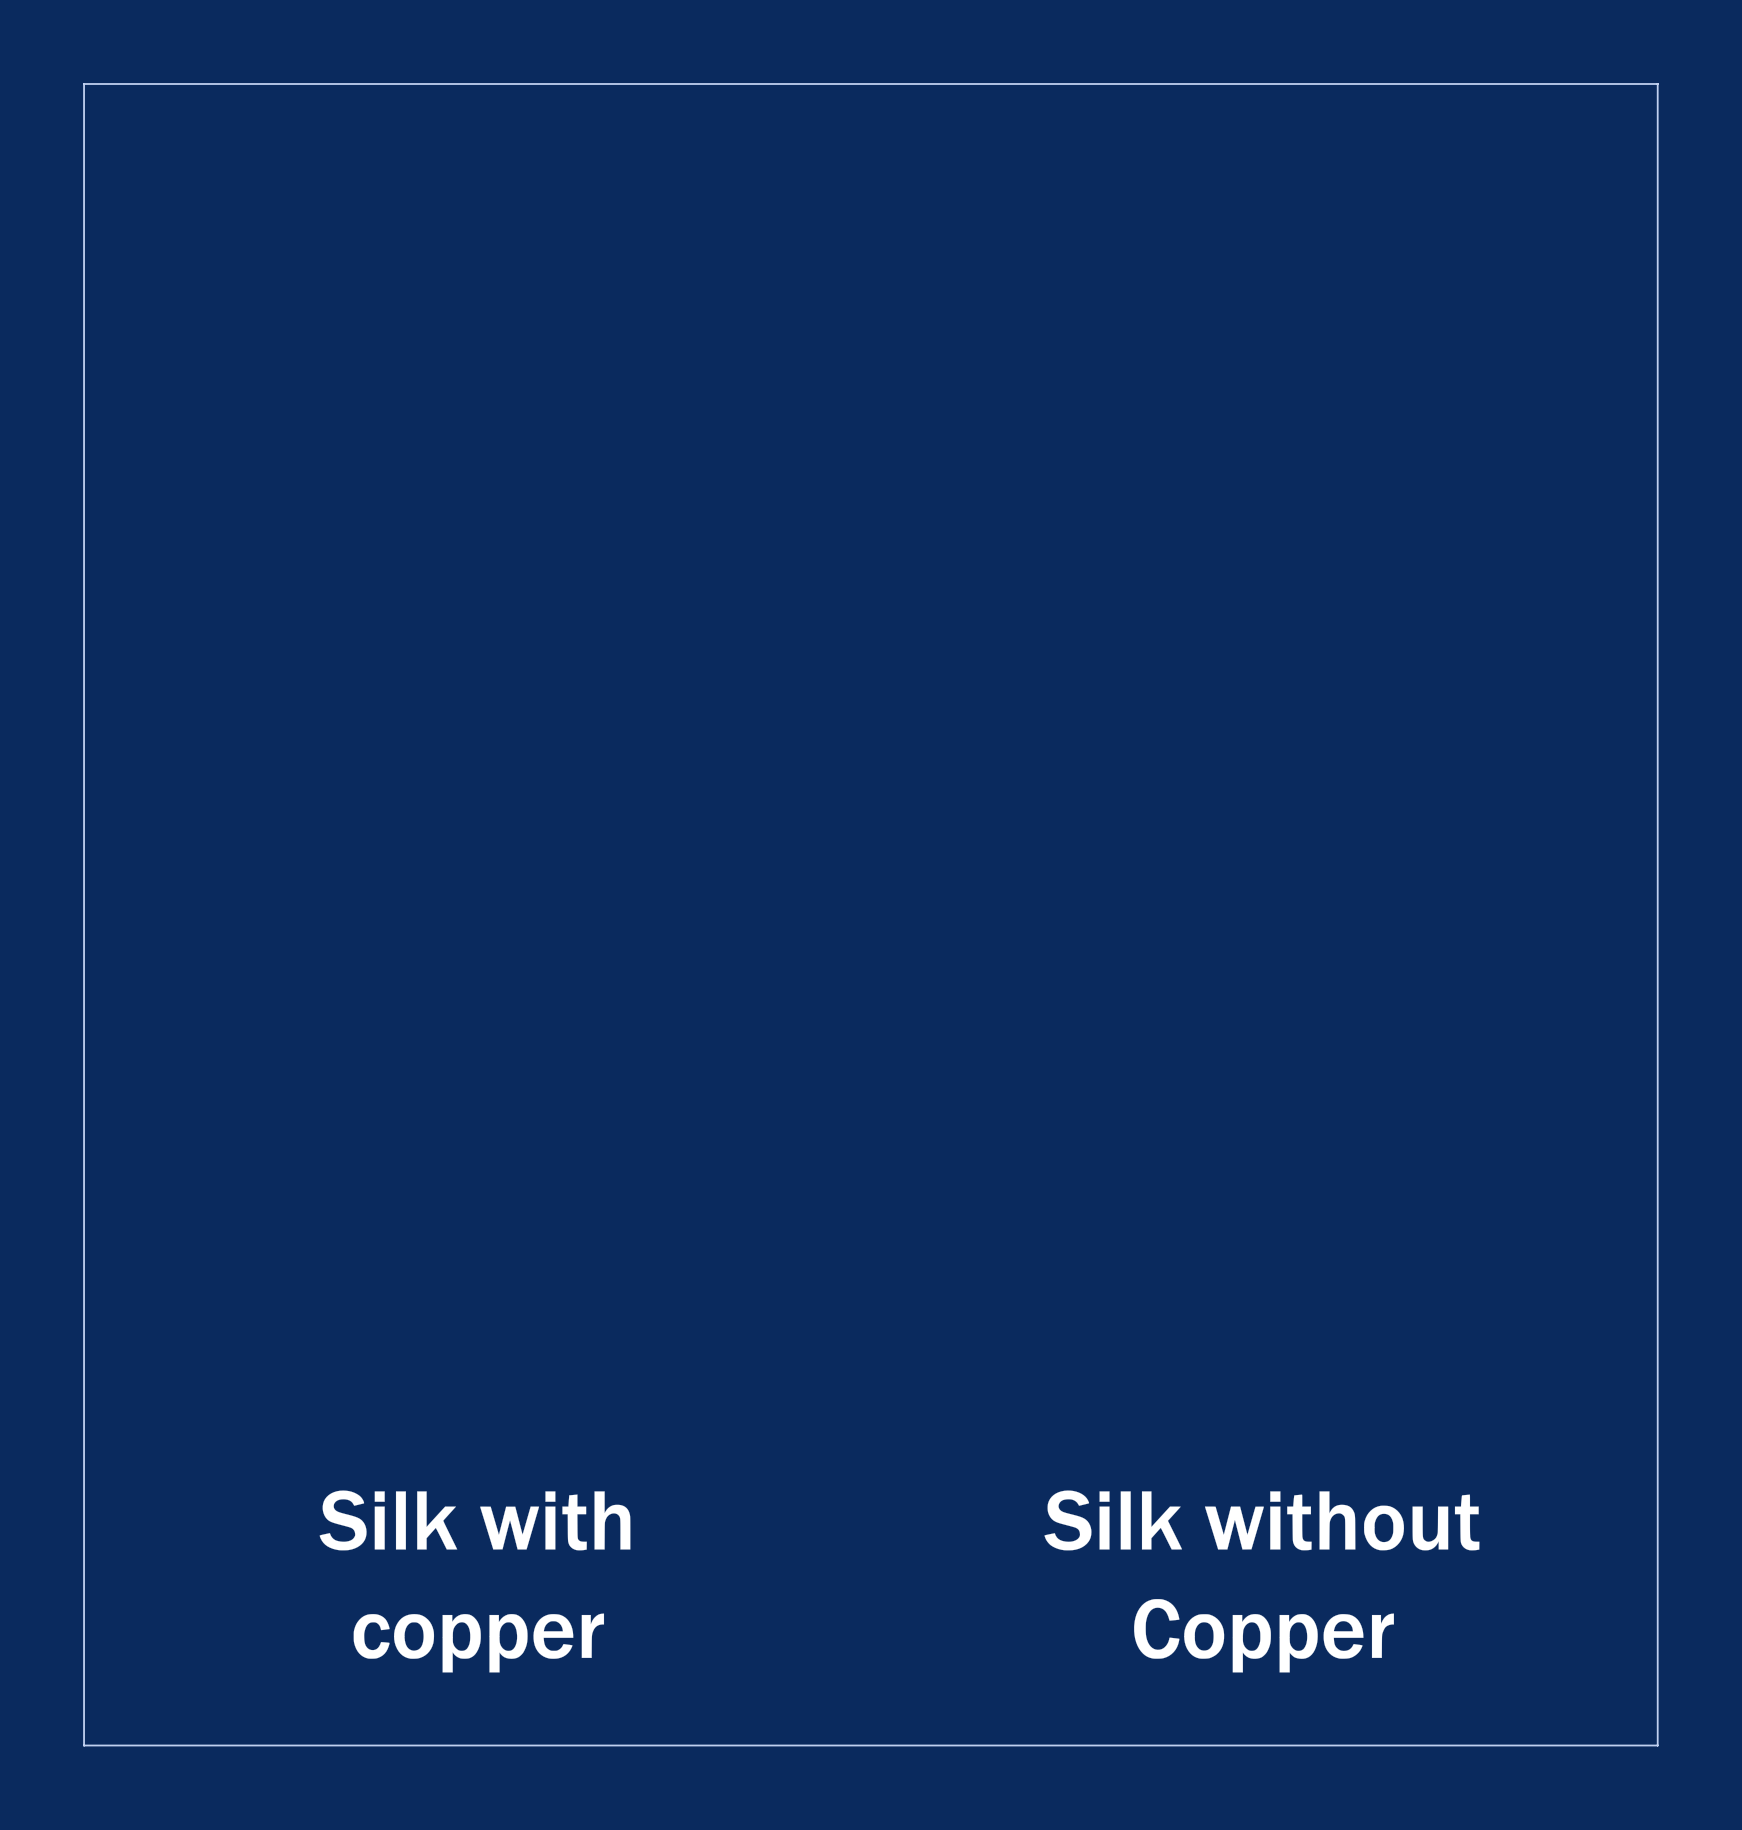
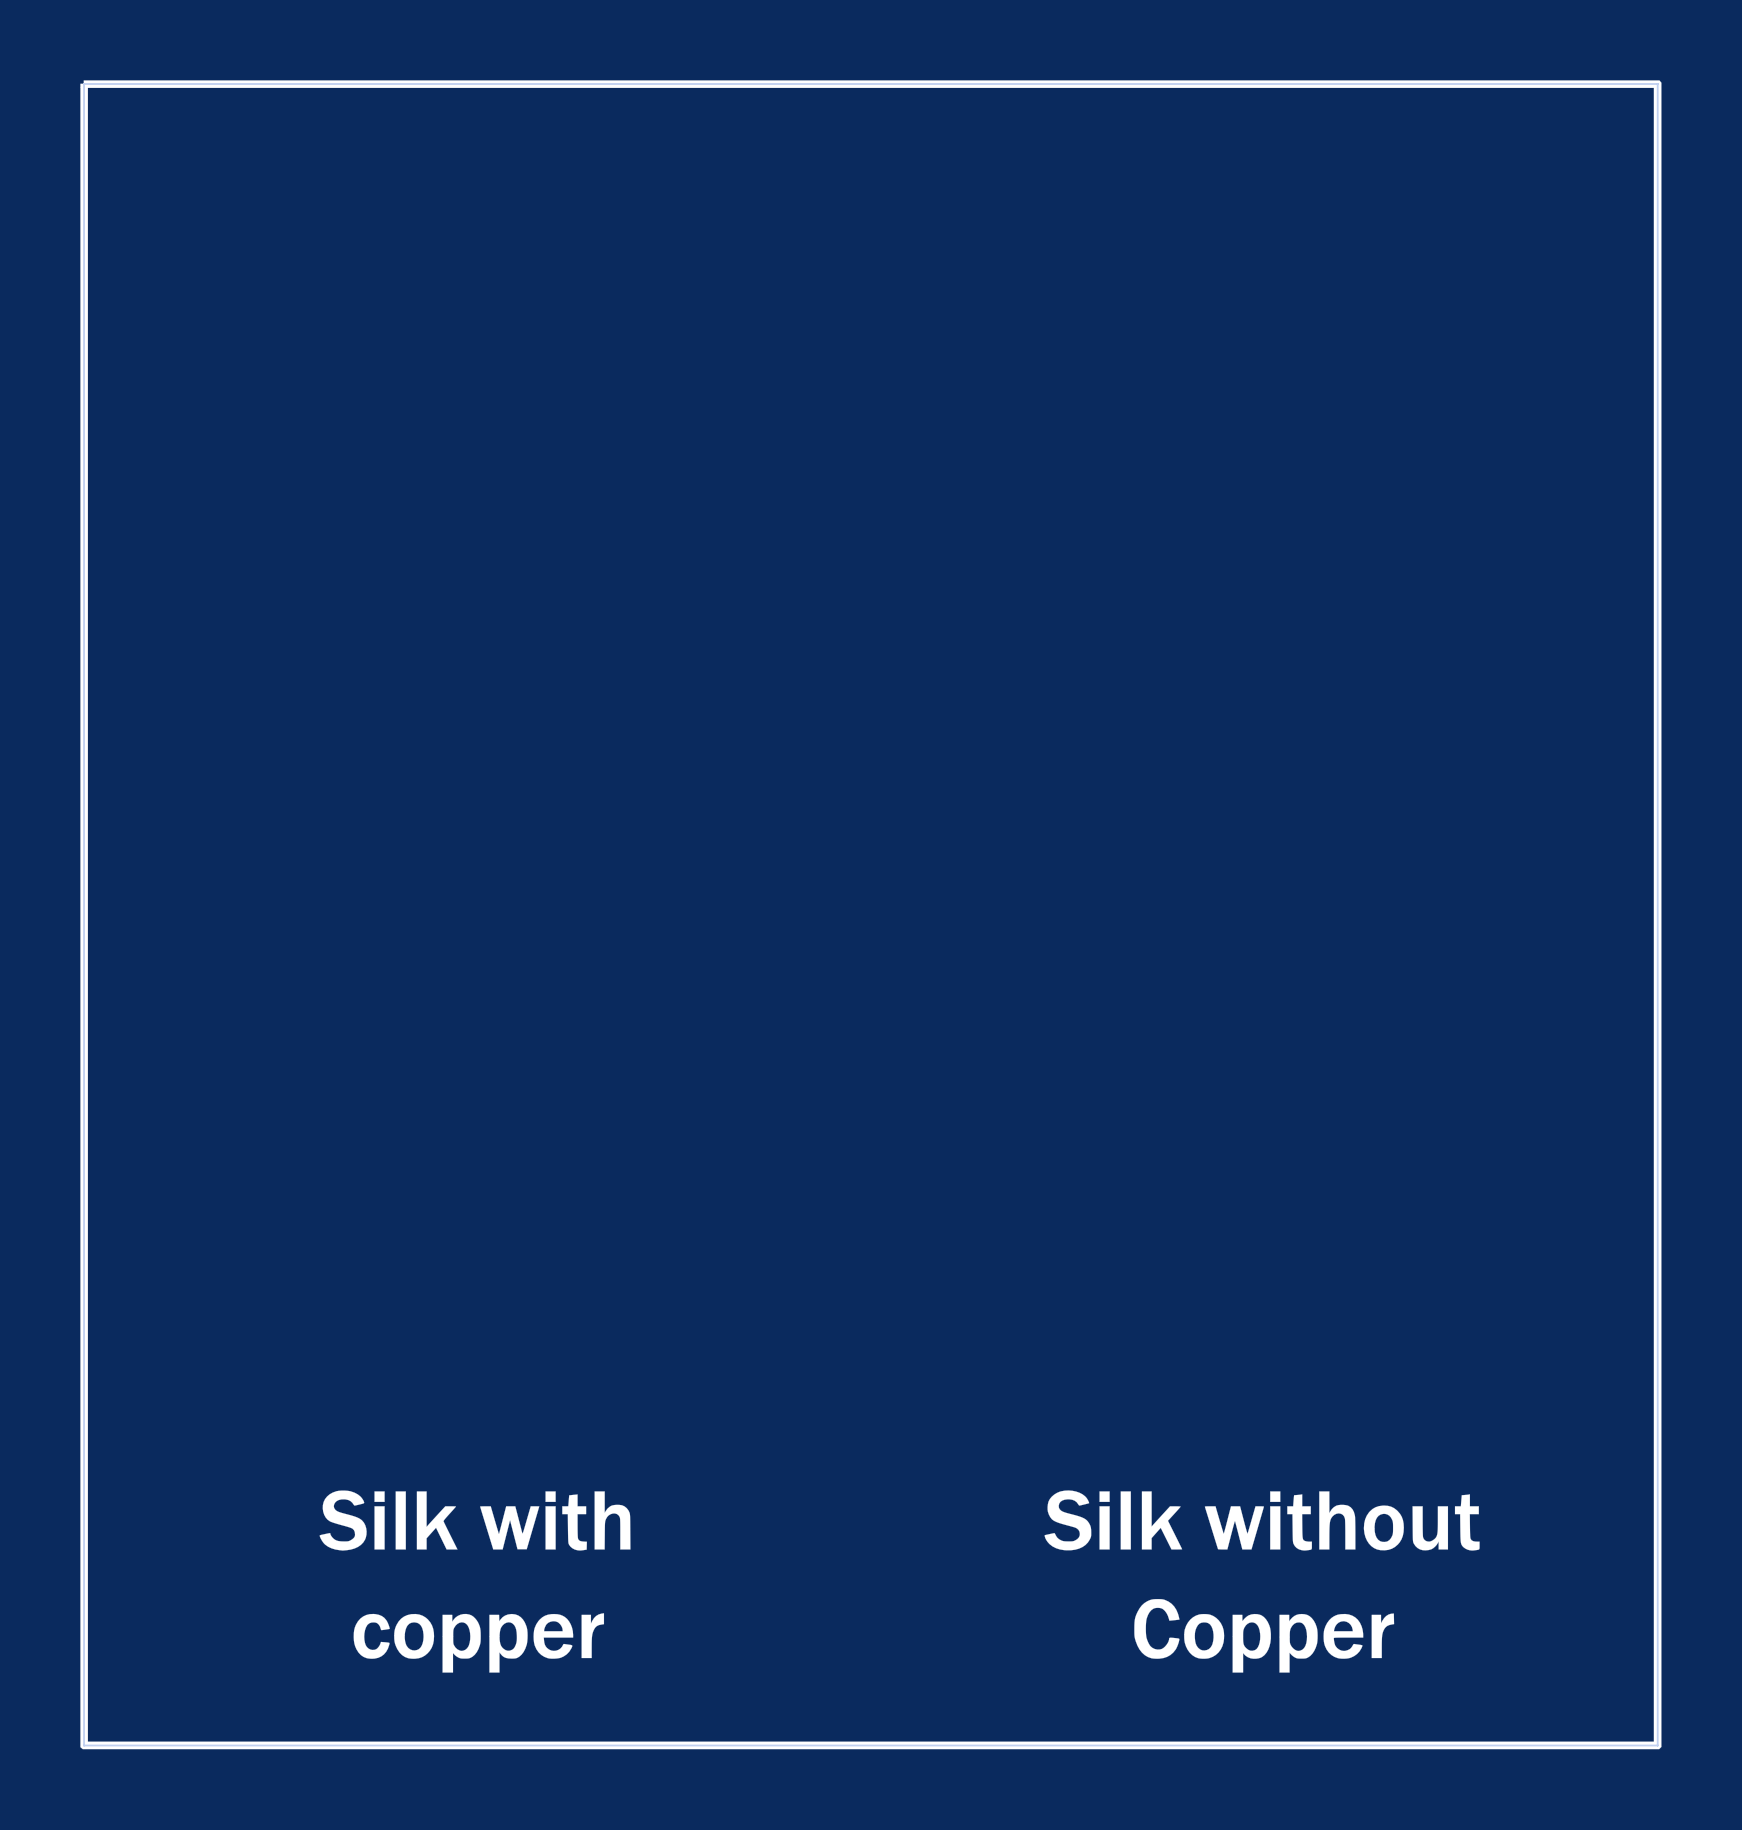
drawing: none -> [80, 80, 1662, 1750]
drawing: [319, 1490, 1480, 1673] -> none

